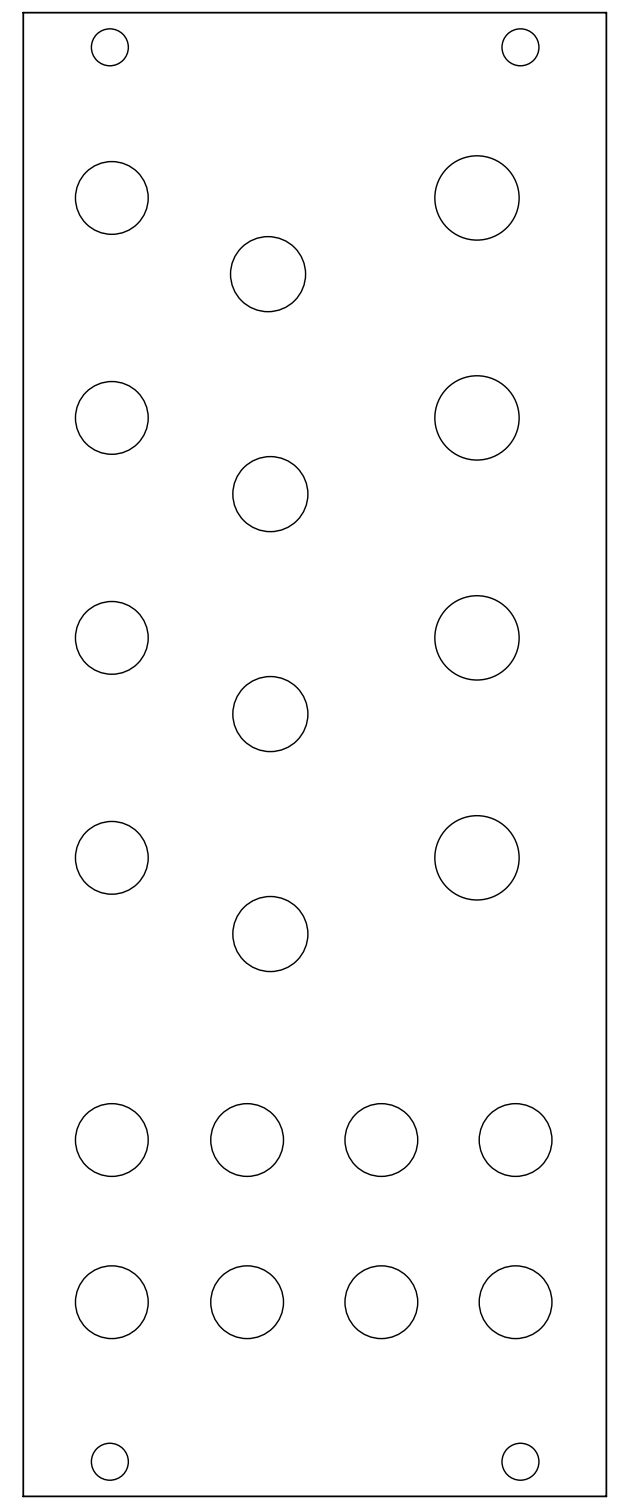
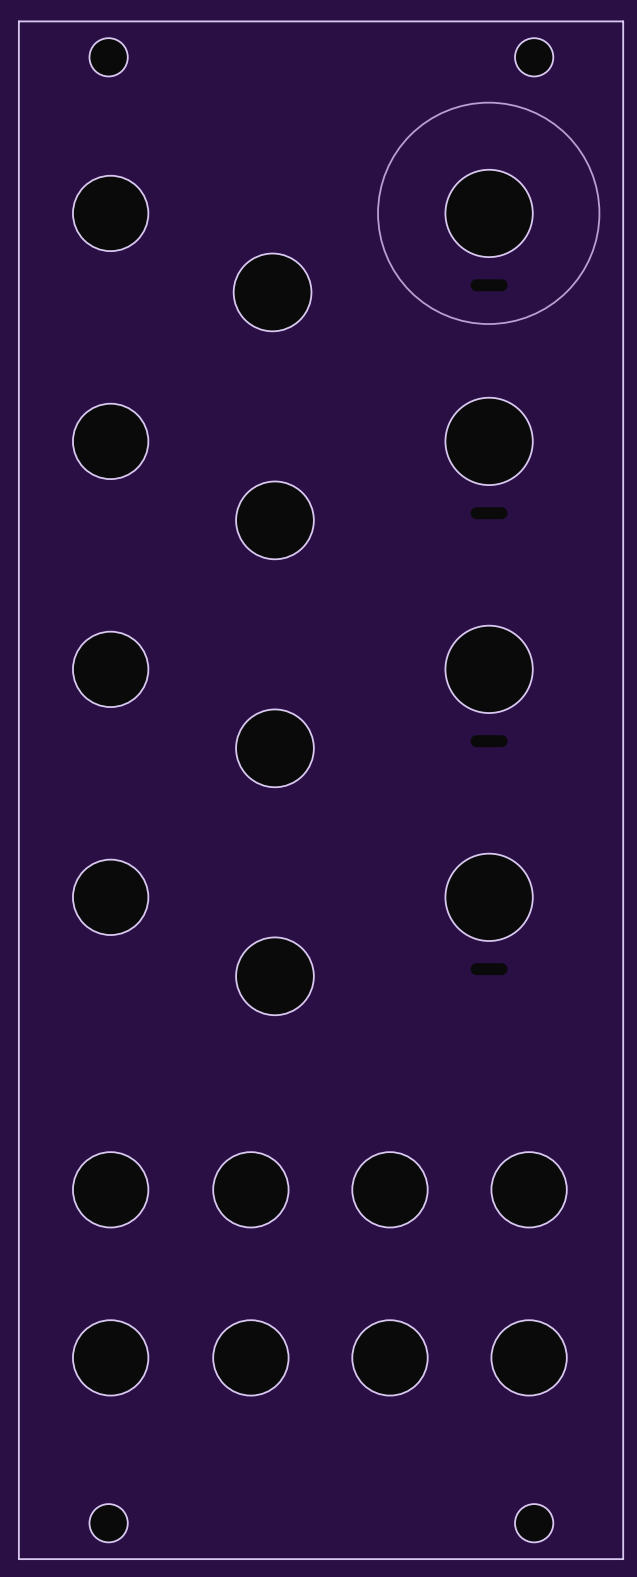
drawing: none -> [377, 102, 601, 325]

